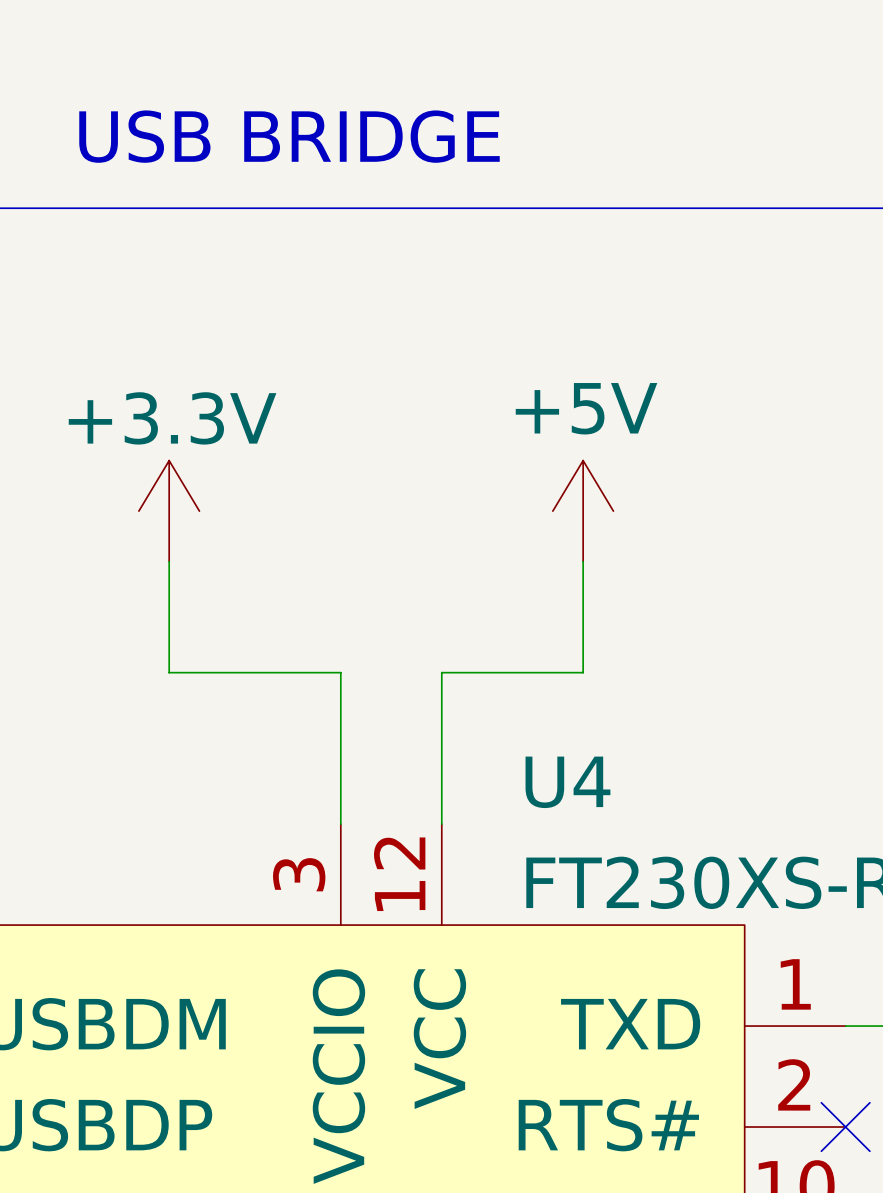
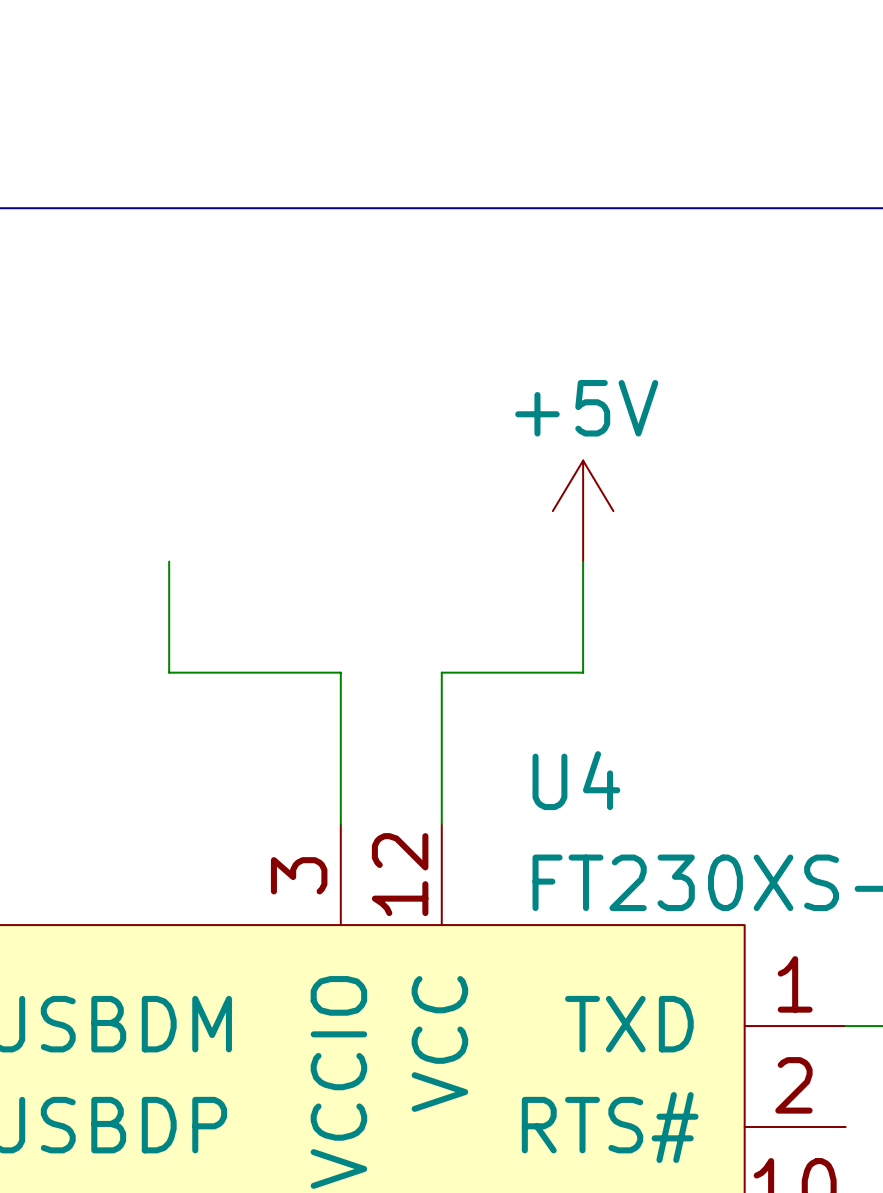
text: USB BRIDGE (289, 136) -> none
power symbol: +3.3V (169, 511) -> none
no-connect mark: (845, 1127) -> none

